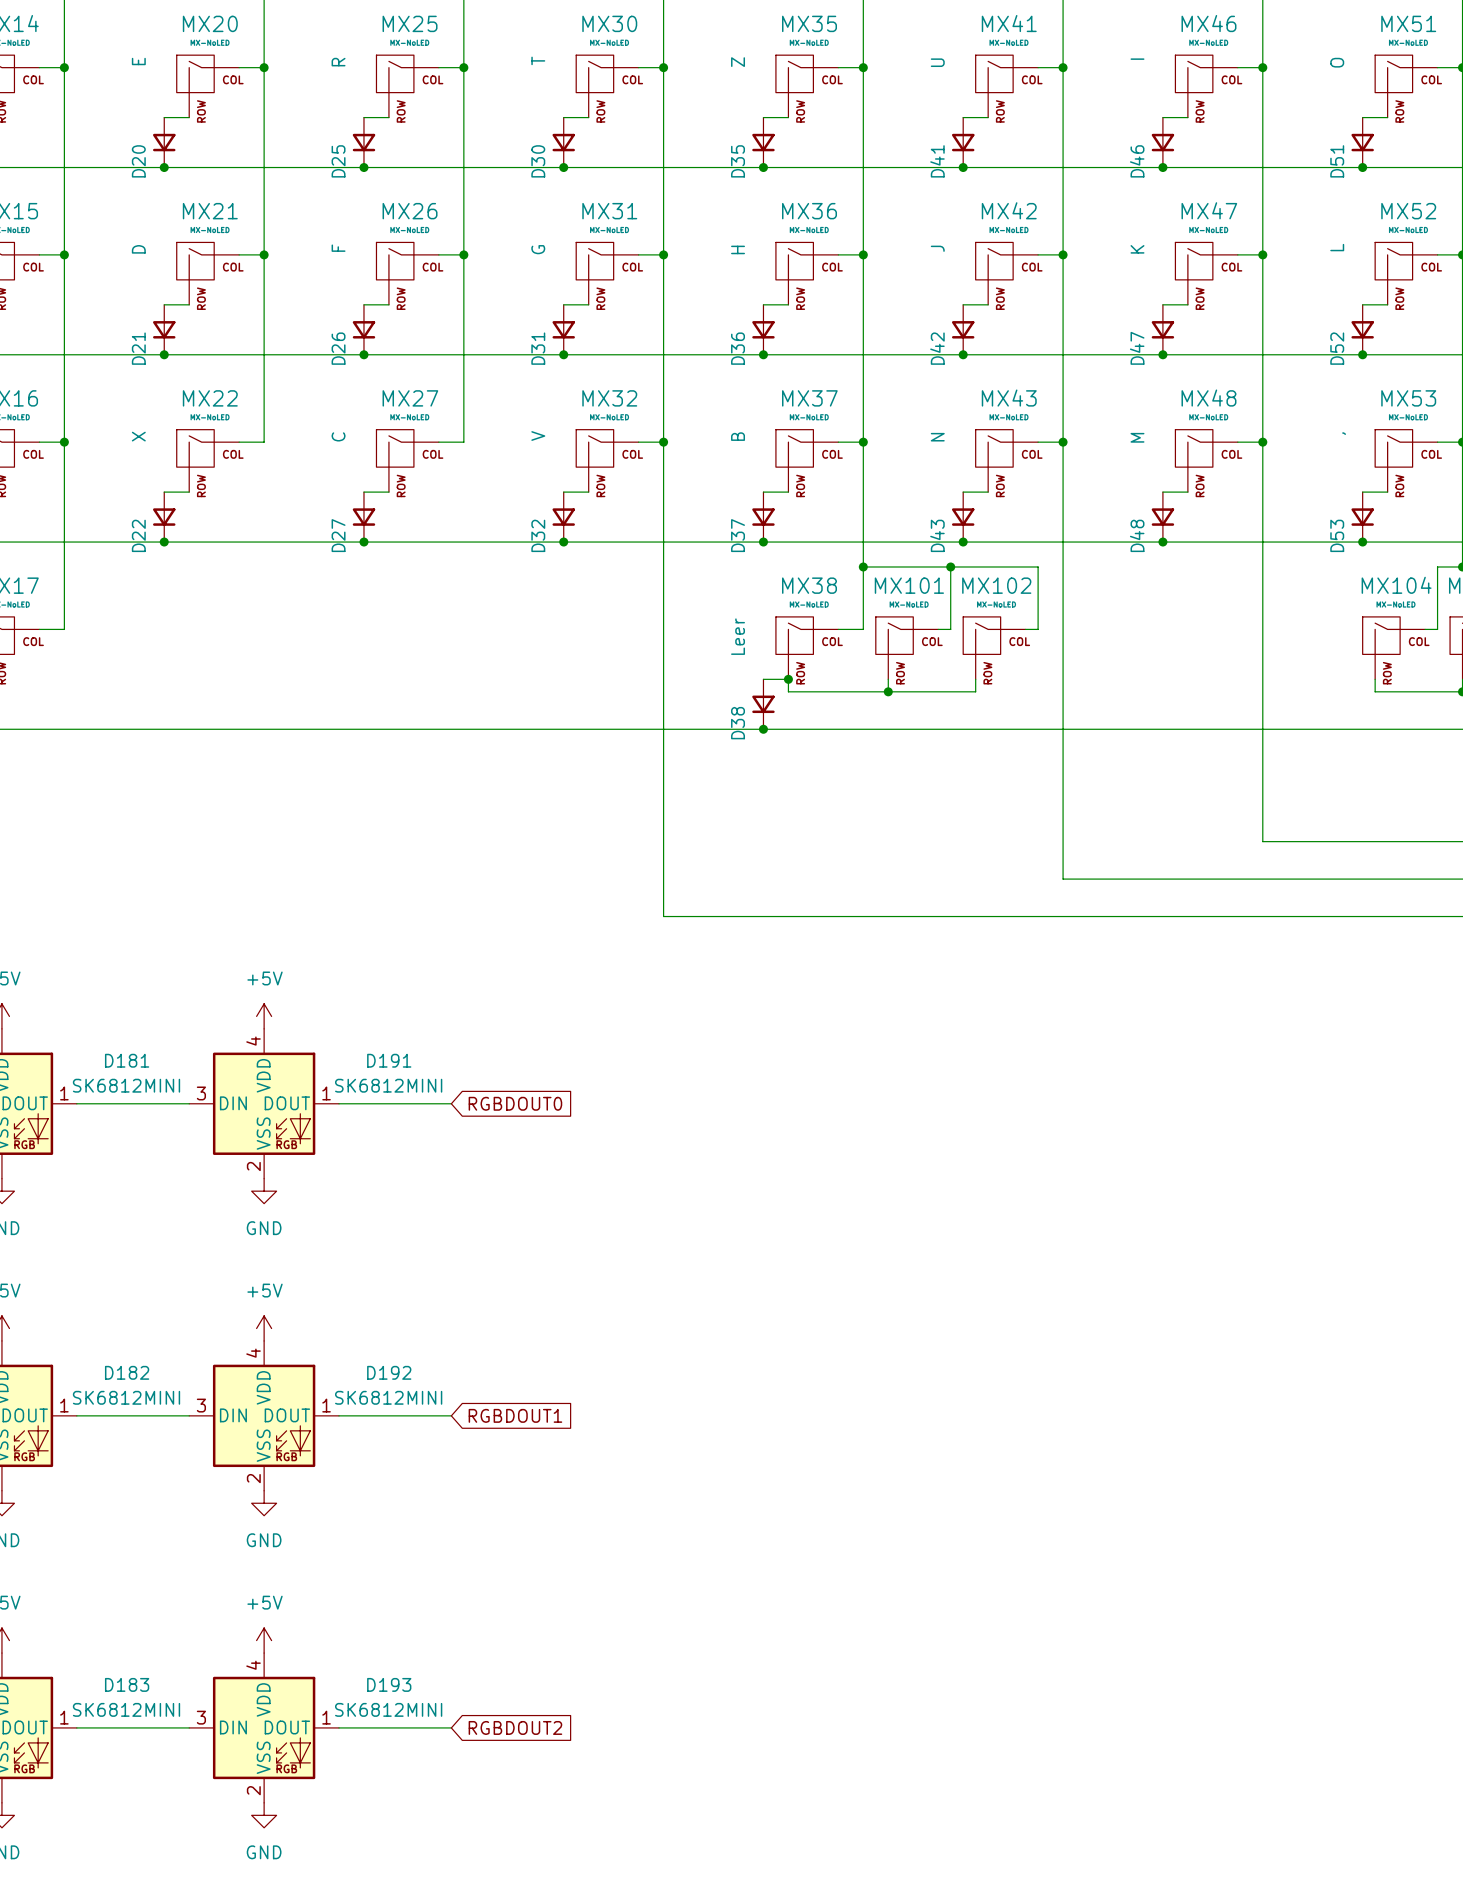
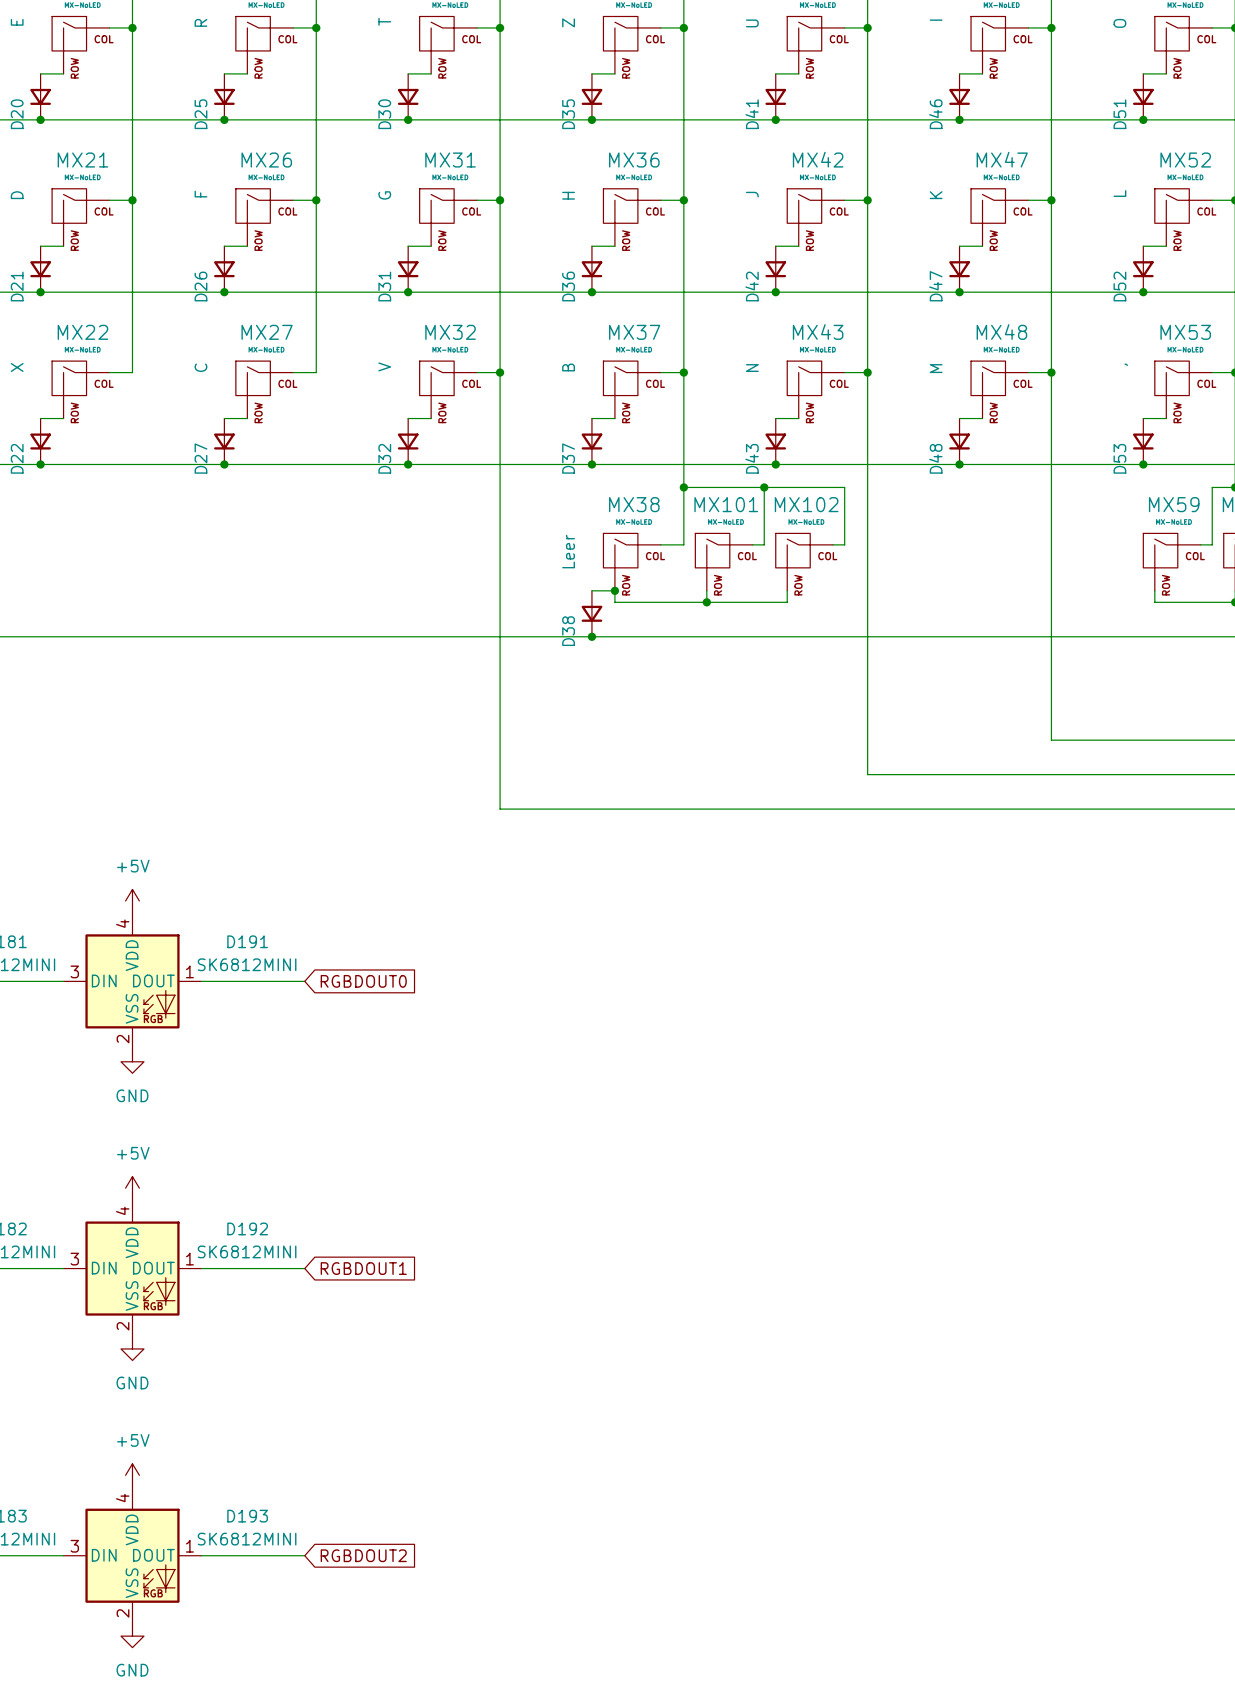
MX104 name: MX104 (1396, 585) -> MX59 (1174, 504)

